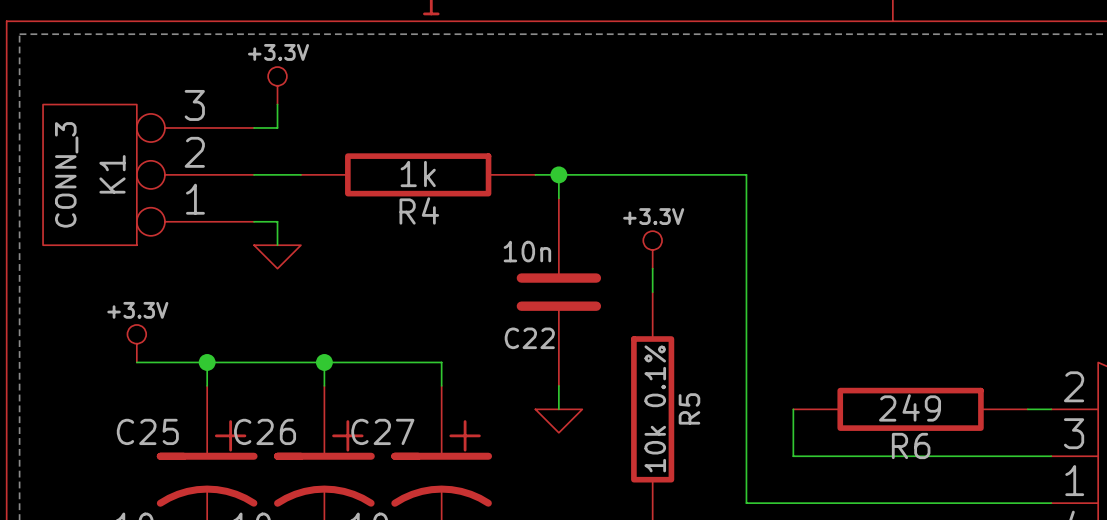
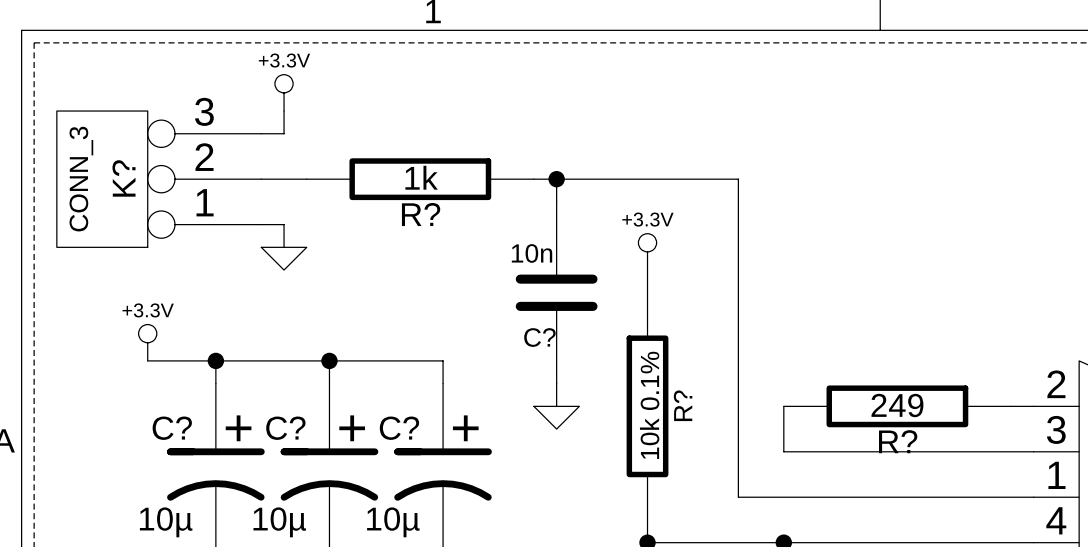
K1 name: K1 (112, 174) -> K? (123, 178)
R4 name: R4 (419, 210) -> R? (421, 214)
C22 name: C22 (529, 338) -> C? (539, 337)
R5 name: R5 (689, 408) -> R? (683, 405)
C25 name: C25 (147, 431) -> C? (172, 428)
C26 name: C26 (265, 431) -> C? (285, 428)
C27 name: C27 (382, 431) -> C? (399, 428)
R6 name: R6 (911, 445) -> R? (898, 441)

